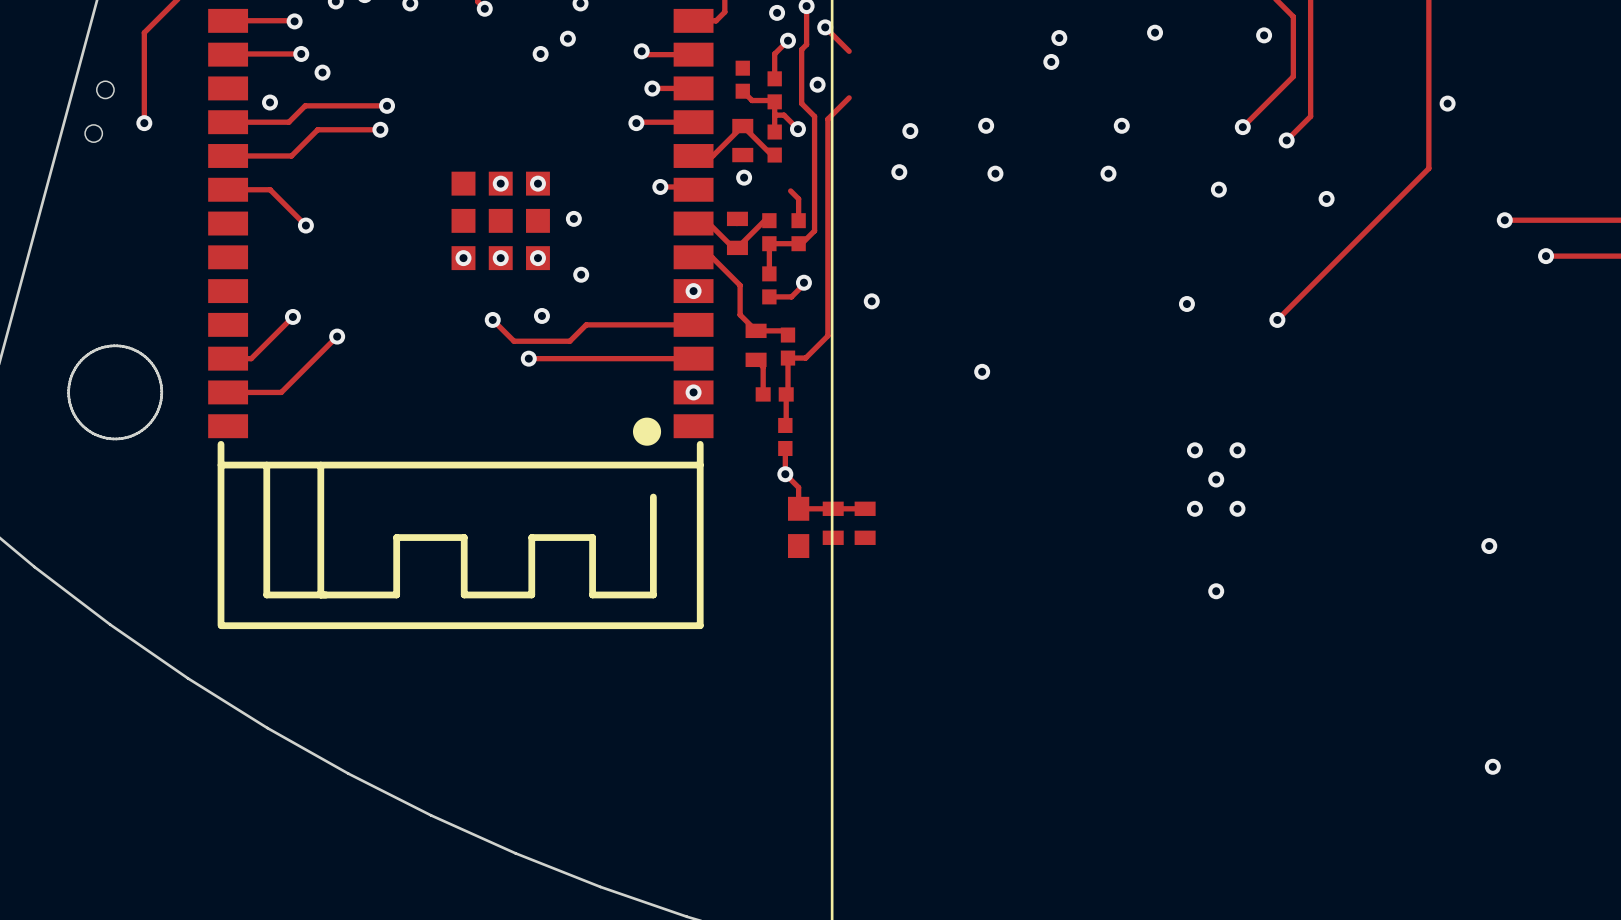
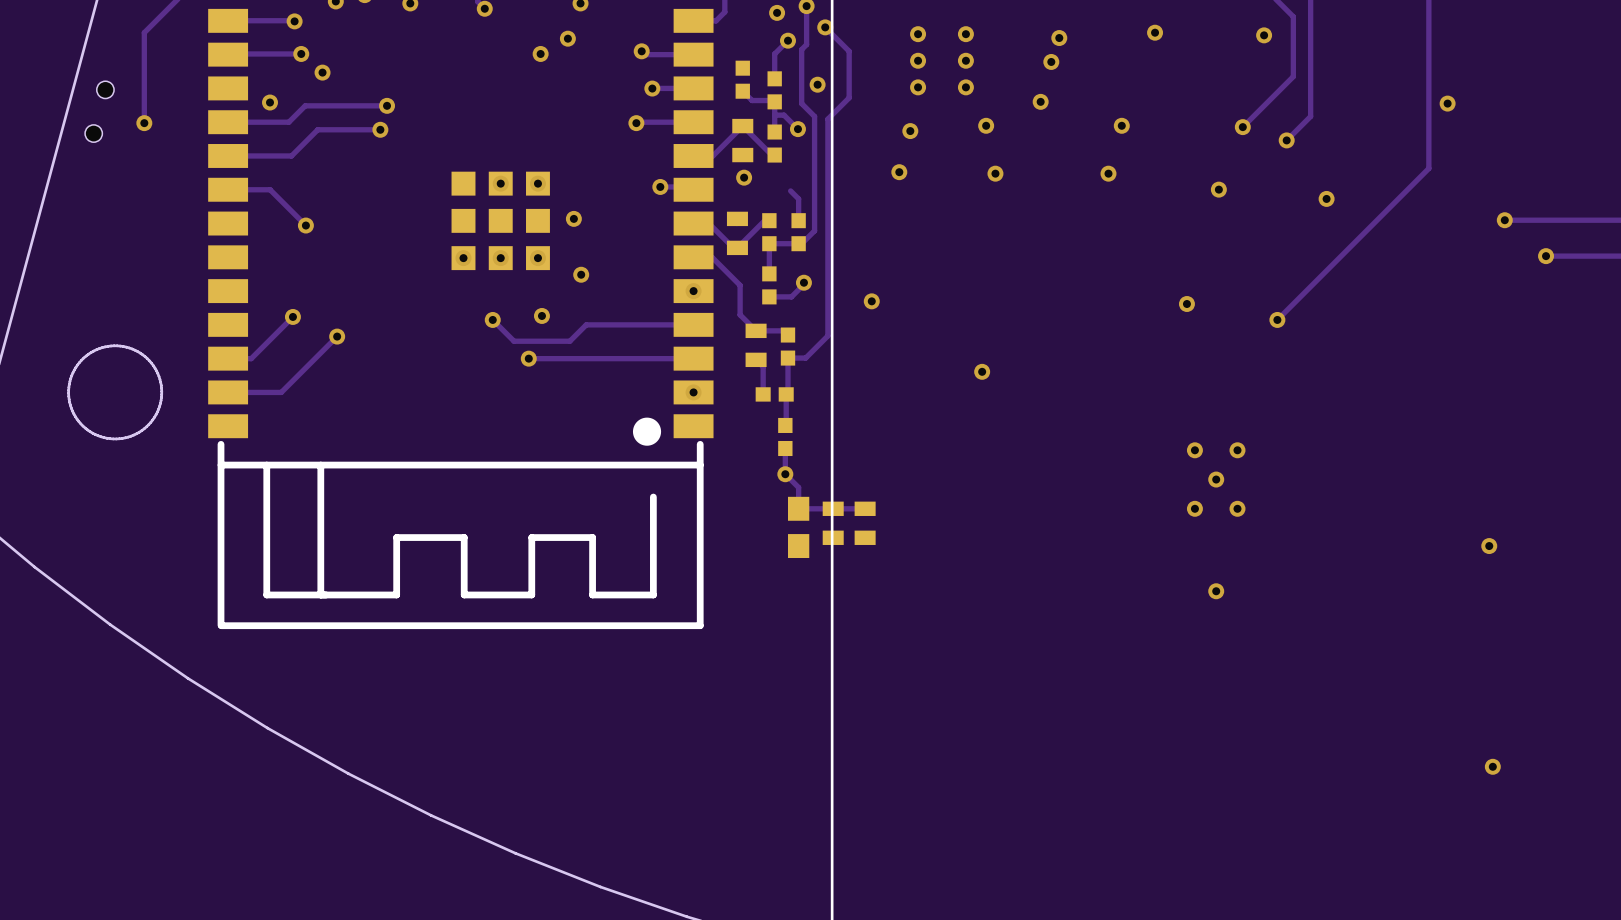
via: none -> (918, 34)
via: none -> (965, 34)
track: none -> (849, 51) (849, 97)
via: none -> (918, 60)
via: none -> (965, 60)
via: none -> (918, 87)
via: none -> (965, 87)
via: none -> (1040, 101)

